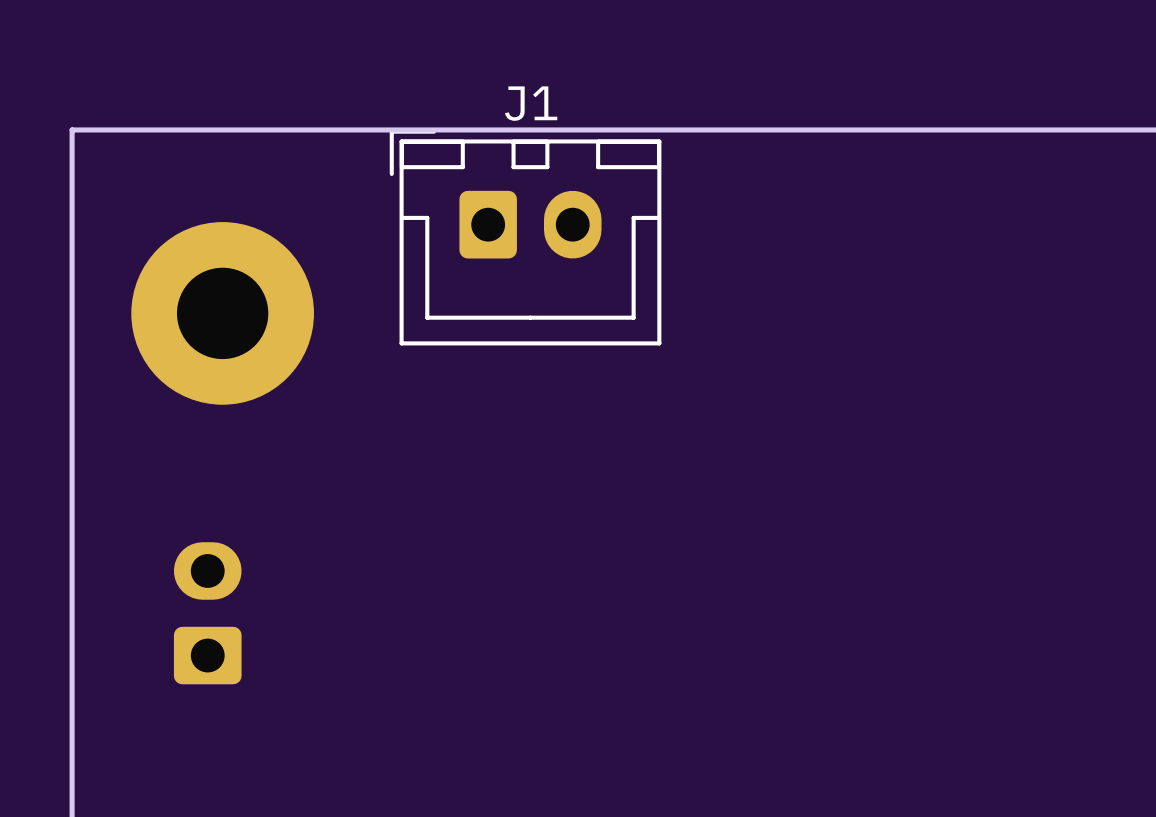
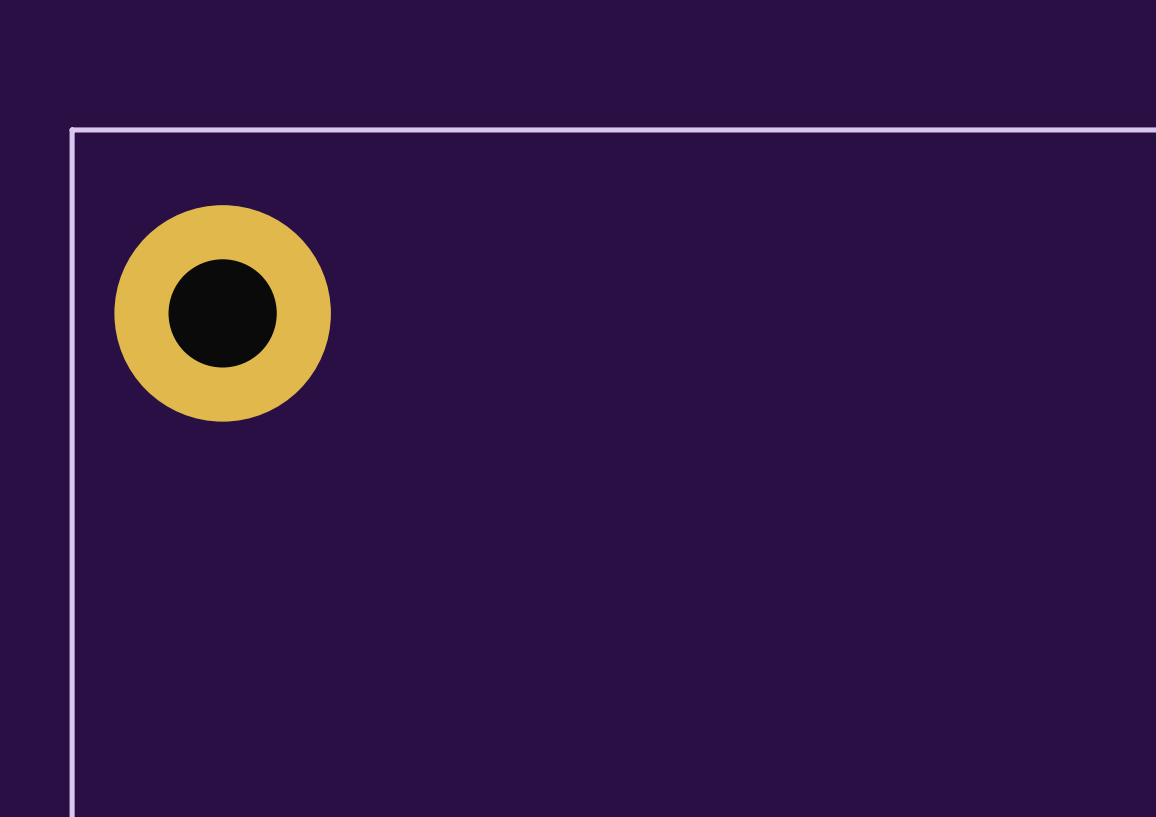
part footprint: [131, 222, 314, 405] -> [114, 205, 331, 422]
J1: (525, 237) -> none
part: (207, 613) -> none

